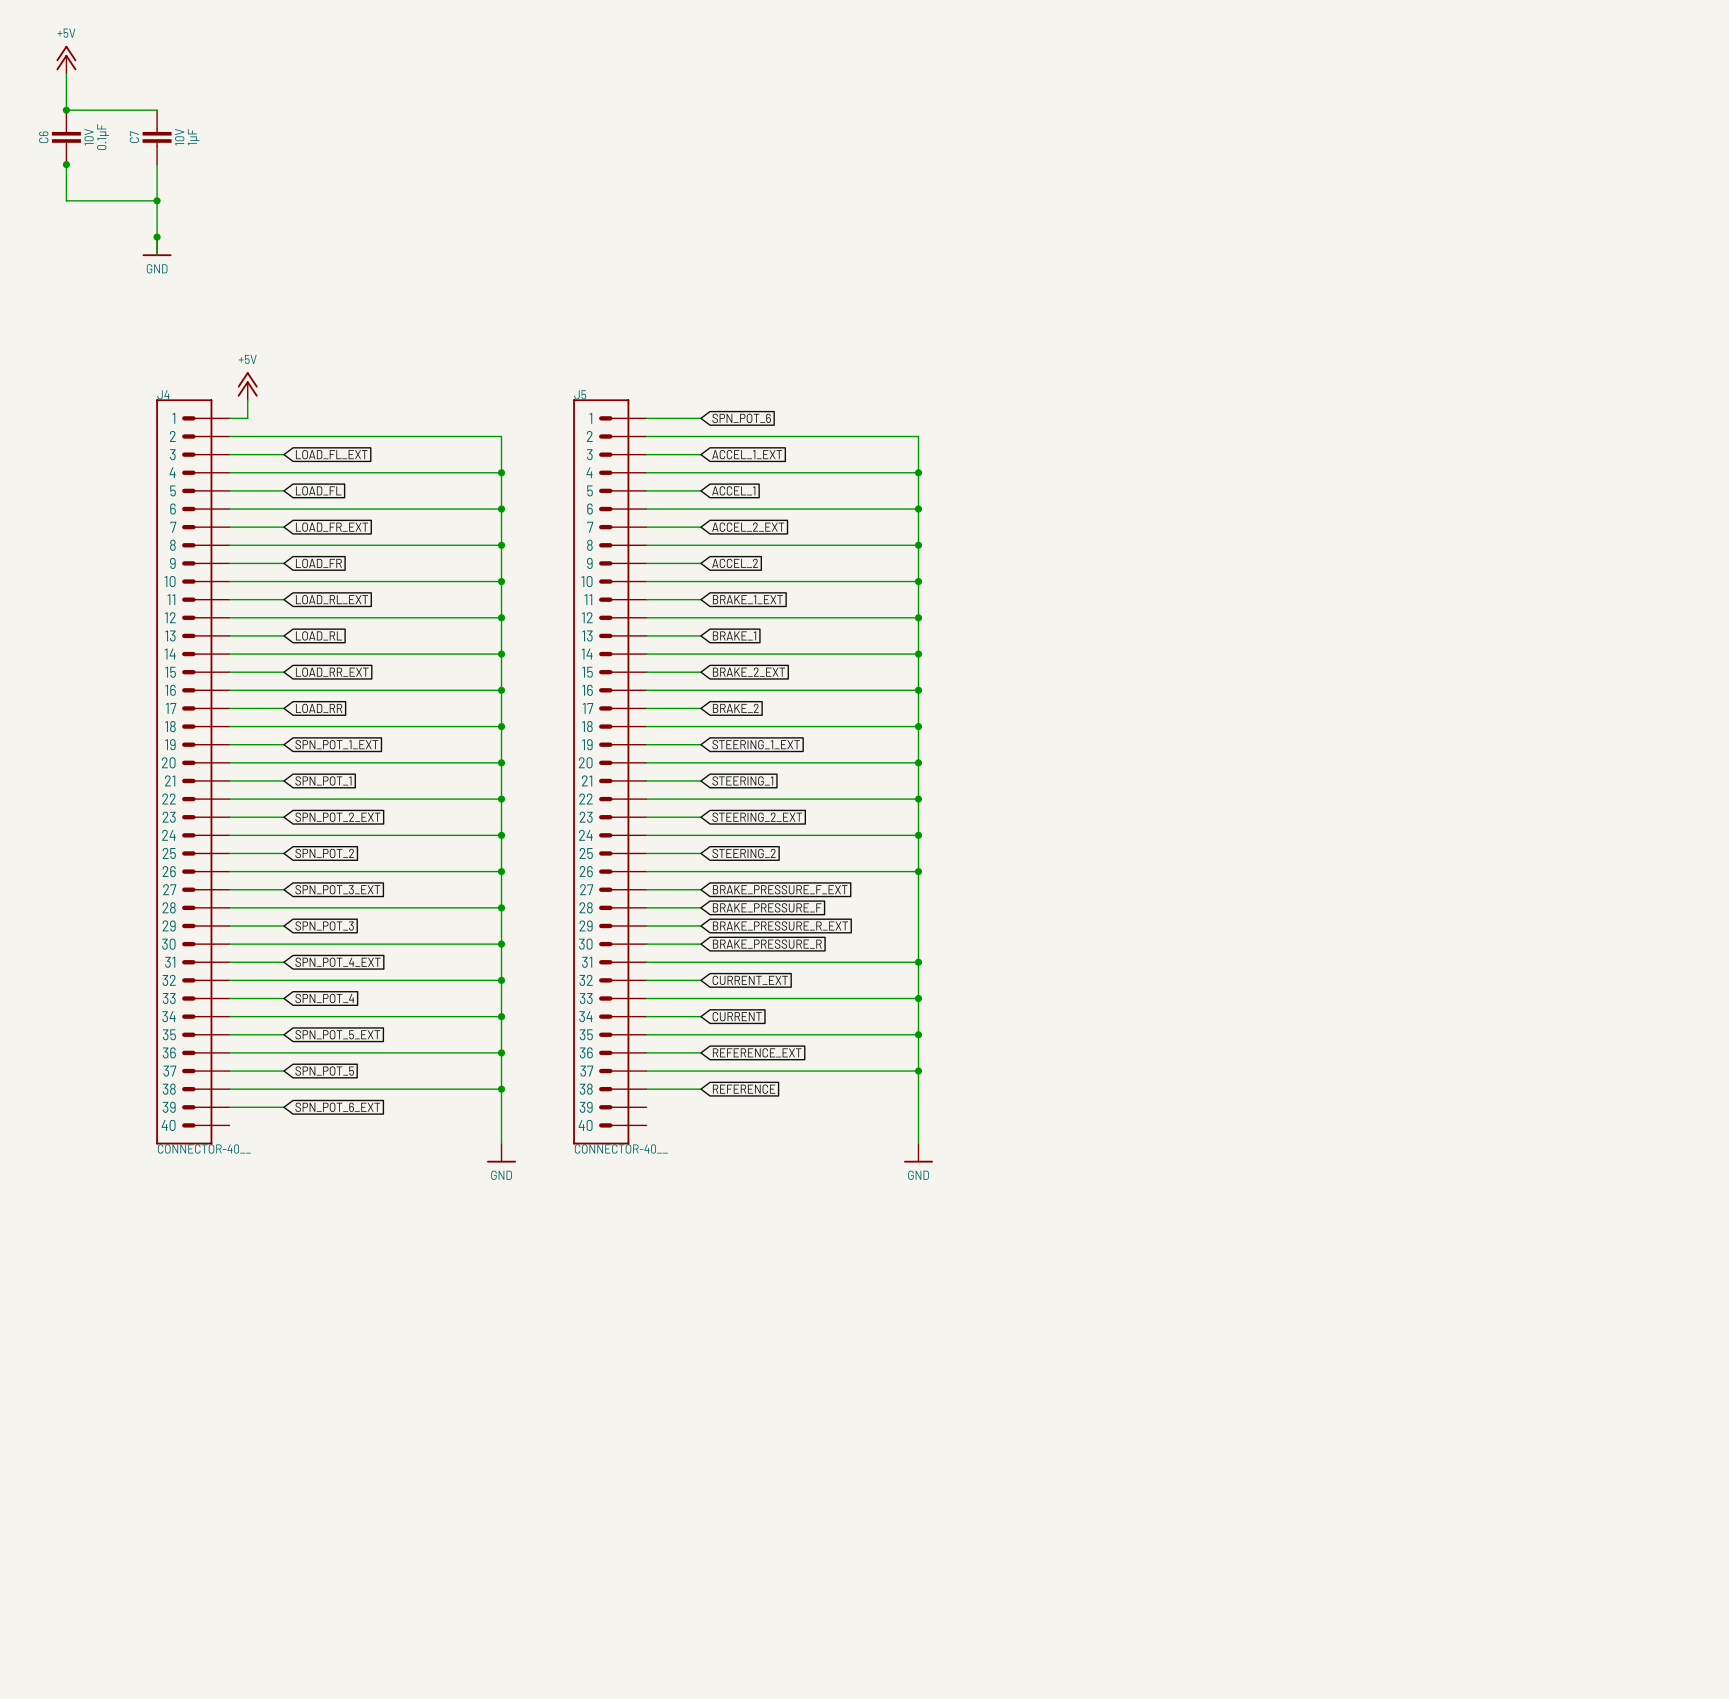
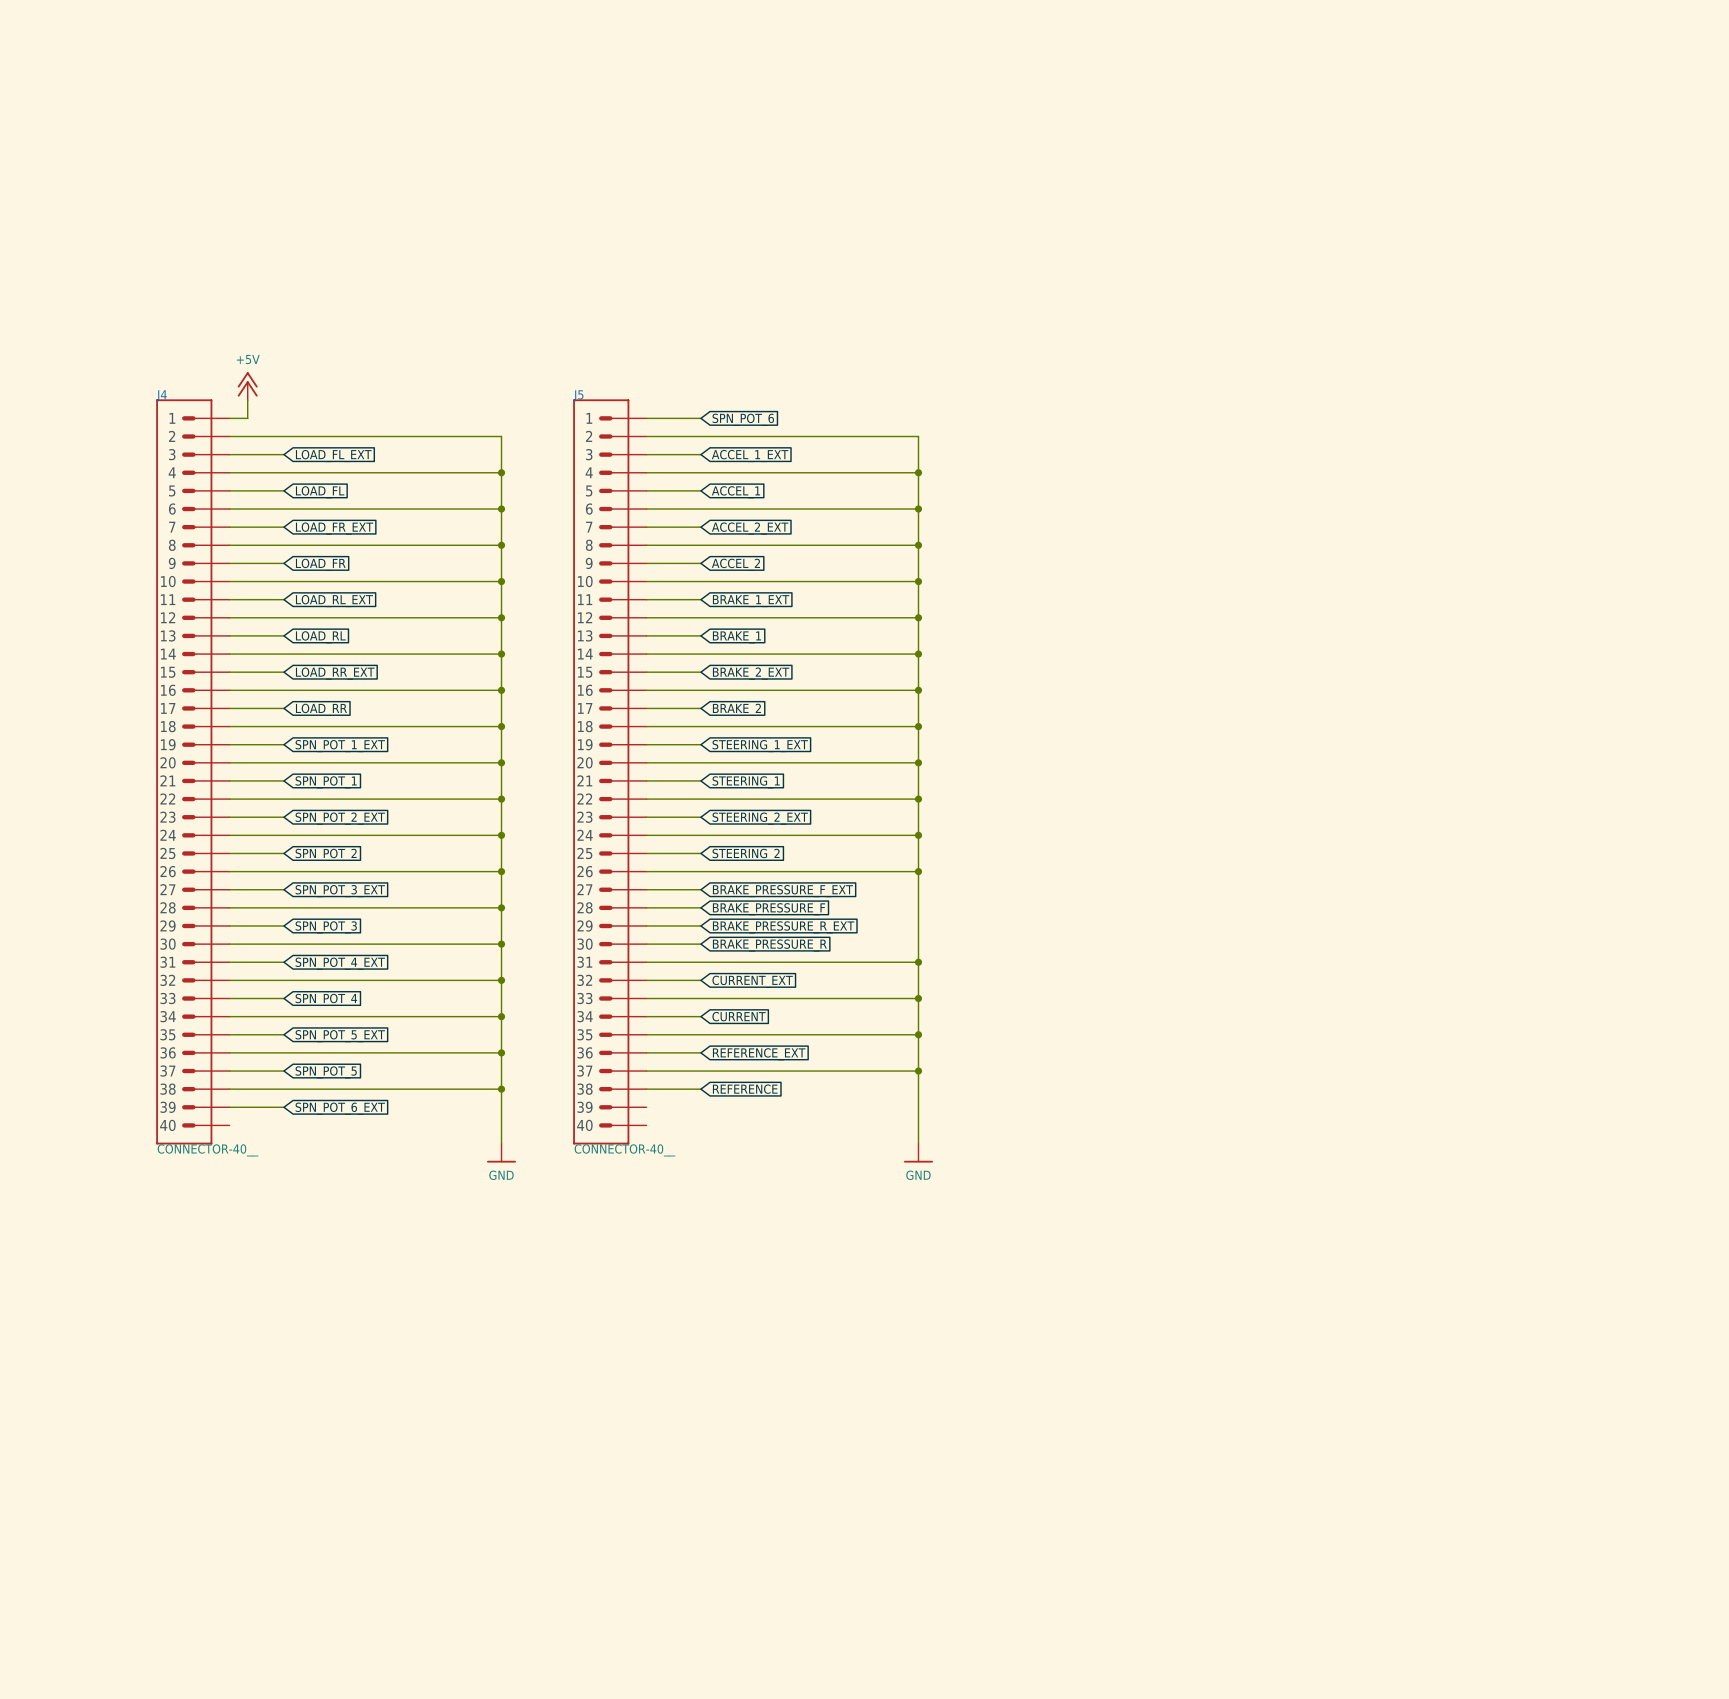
power symbol: +5V (66, 59) -> none
wire: (66, 73) (66, 110) (157, 110) -> none
junction: (66, 110) -> none
C6: (66, 137) -> none
C7: (157, 137) -> none
wire: (66, 164) (66, 200) (157, 200) -> none
junction: (66, 164) -> none
wire: (157, 164) (157, 255) -> none
junction: (157, 200) -> none
junction: (157, 237) -> none
power symbol: GND (157, 246) -> none

